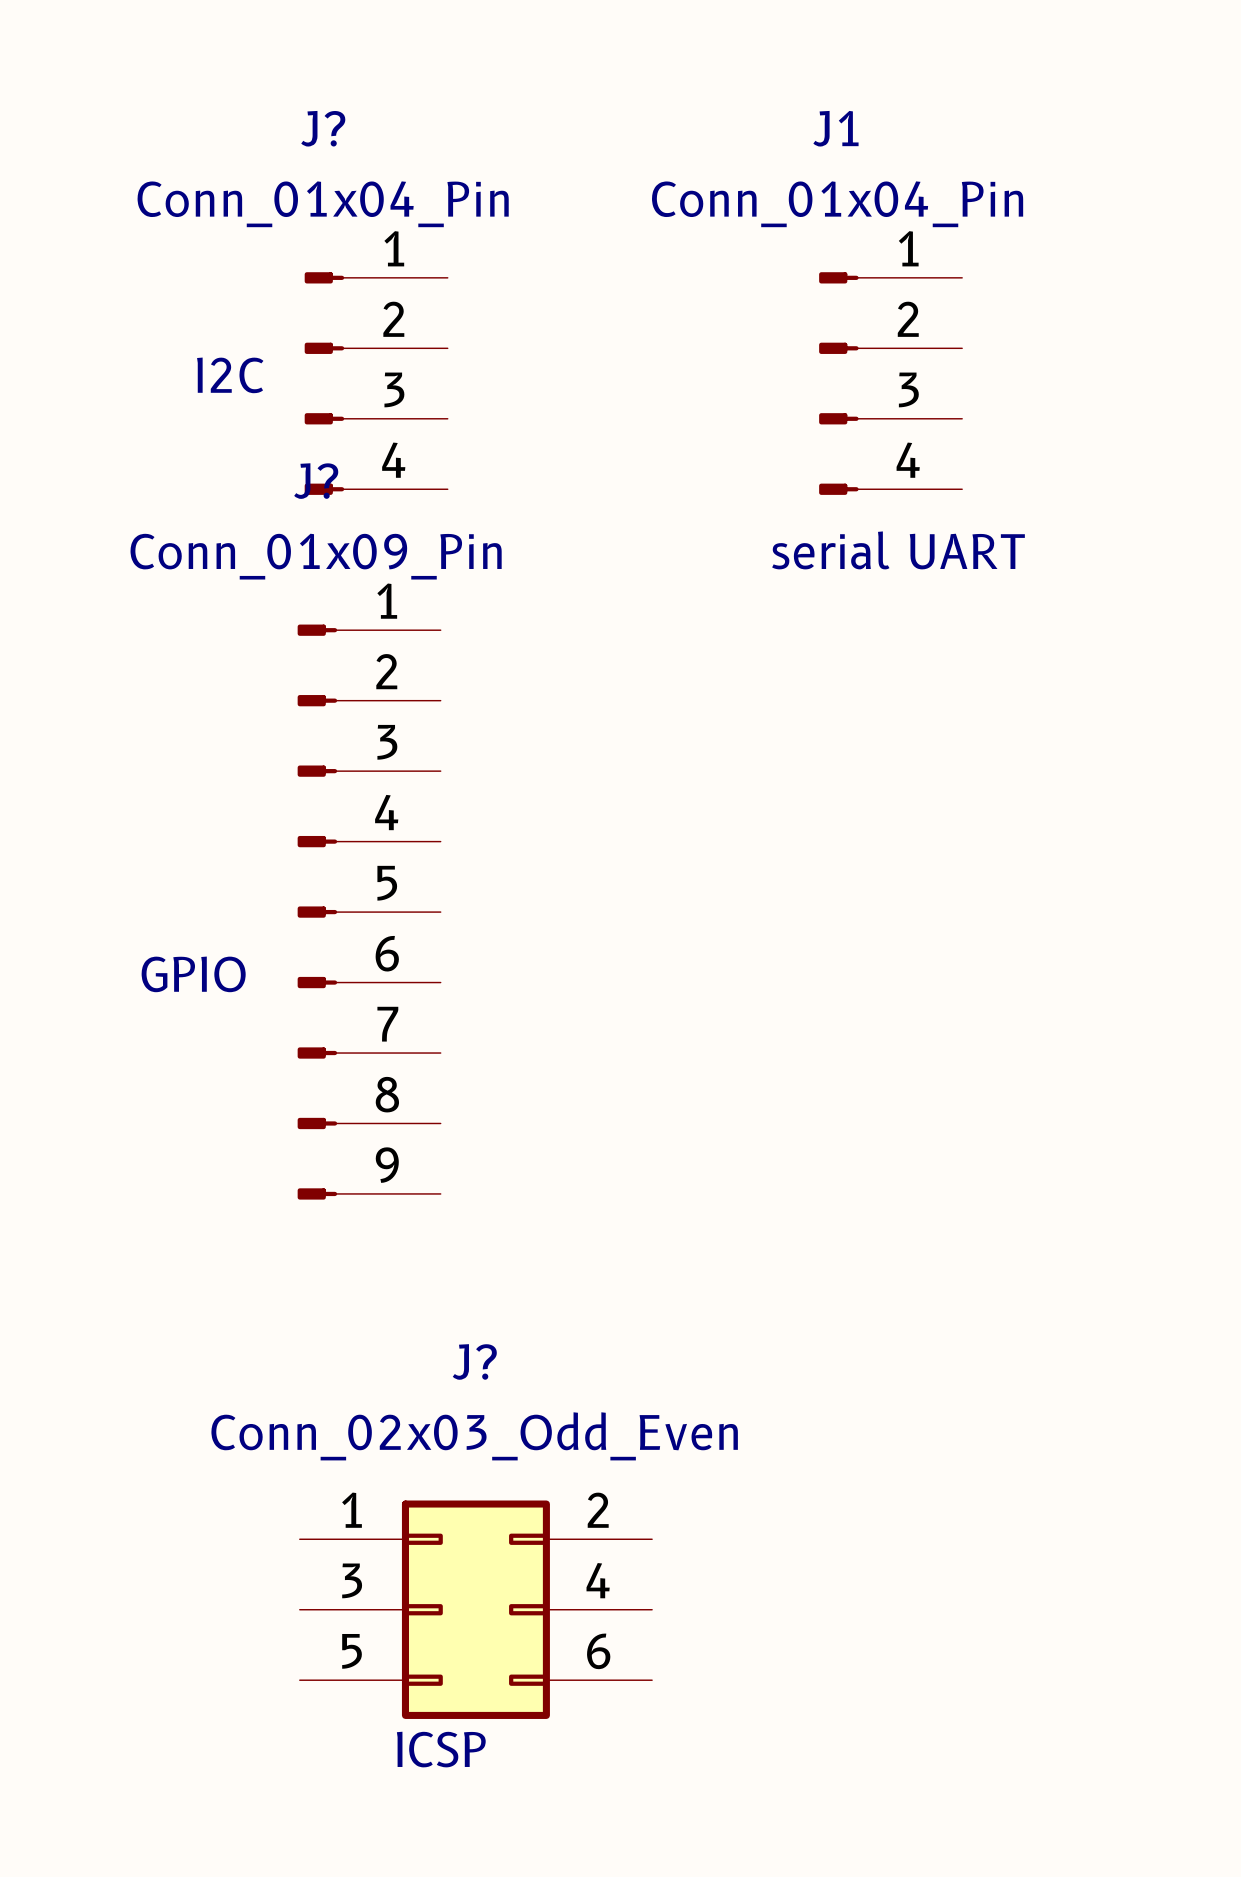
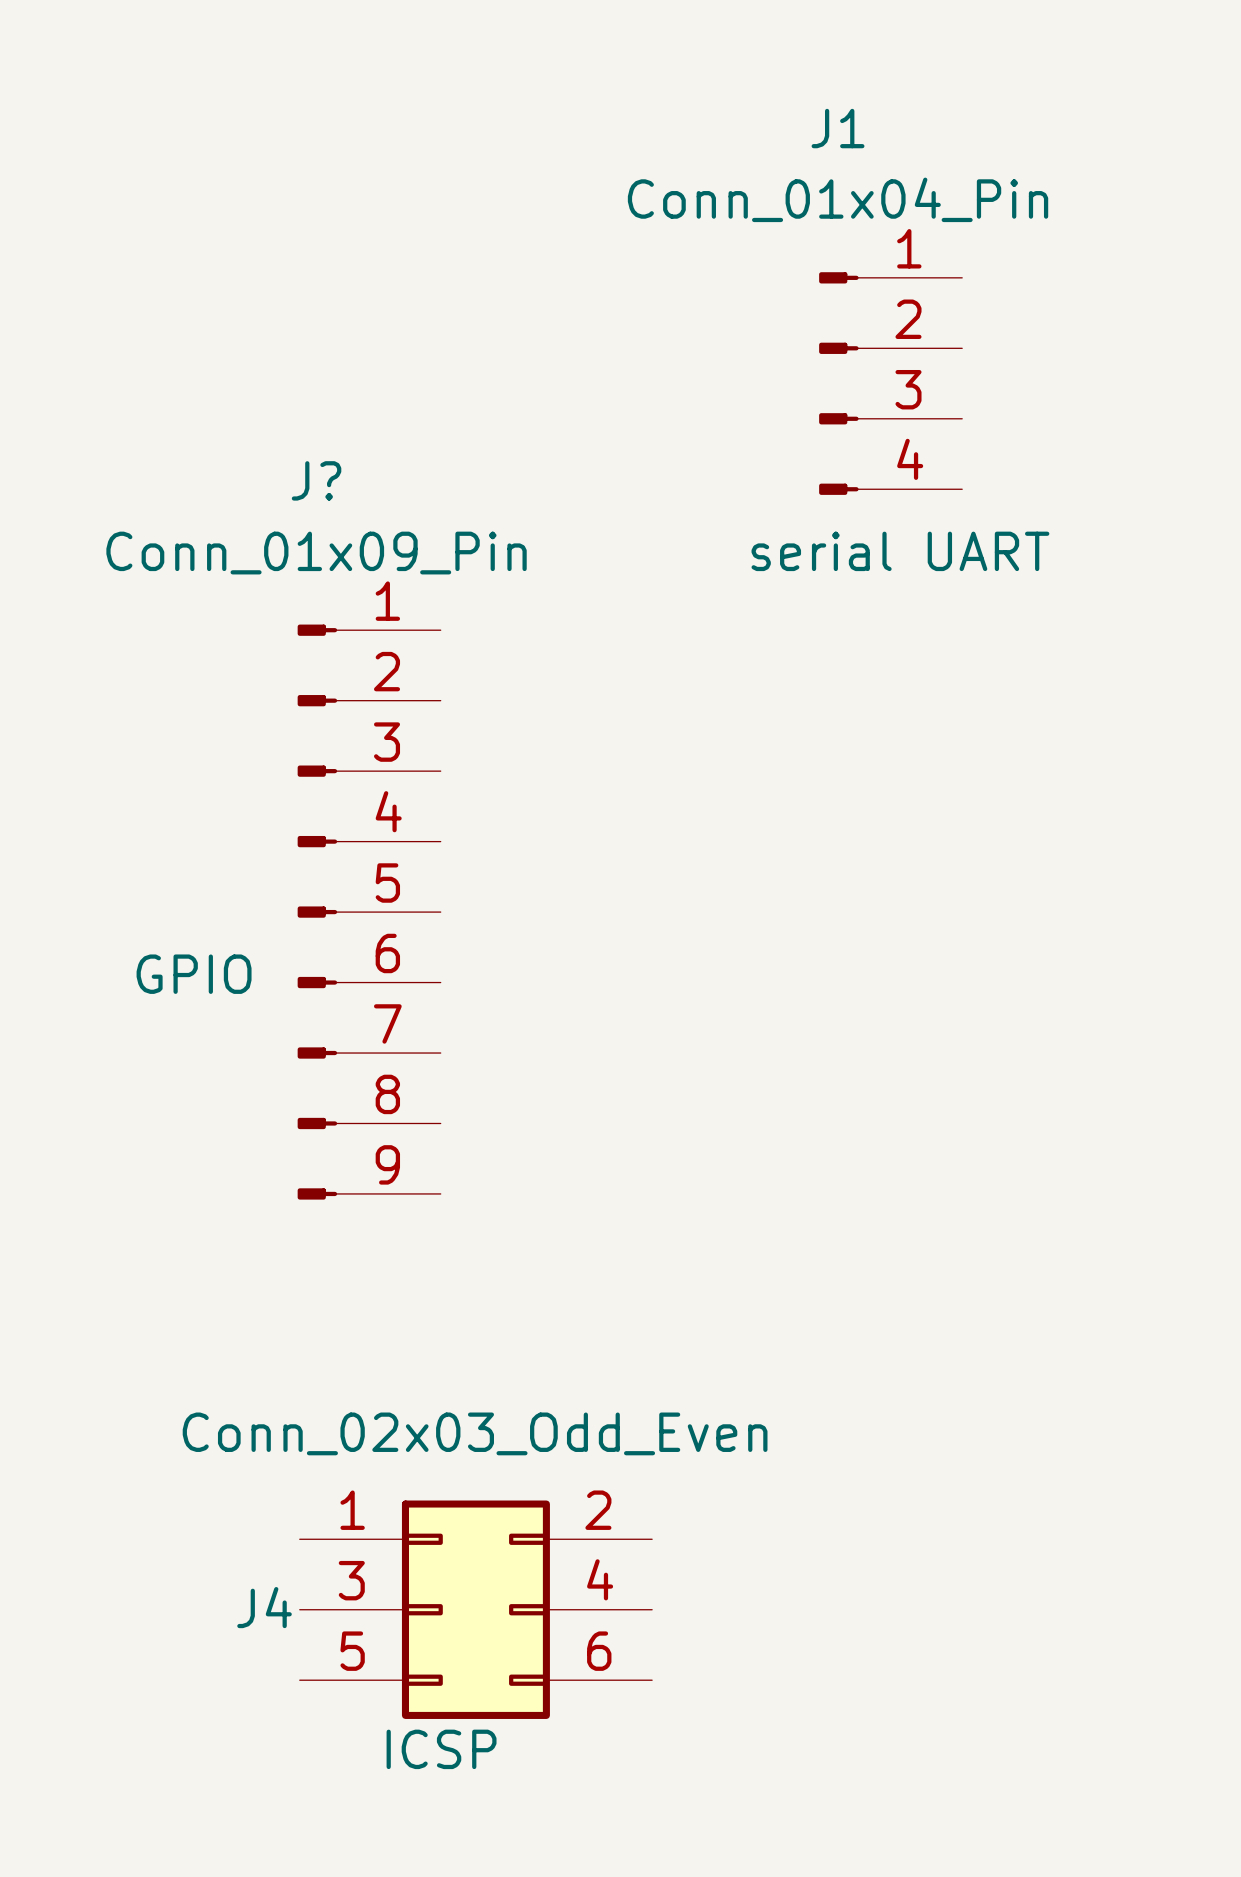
J?: Conn_01x04_Pin (376, 383) -> none
J? name: J? (474, 1361) -> J4 (264, 1607)

